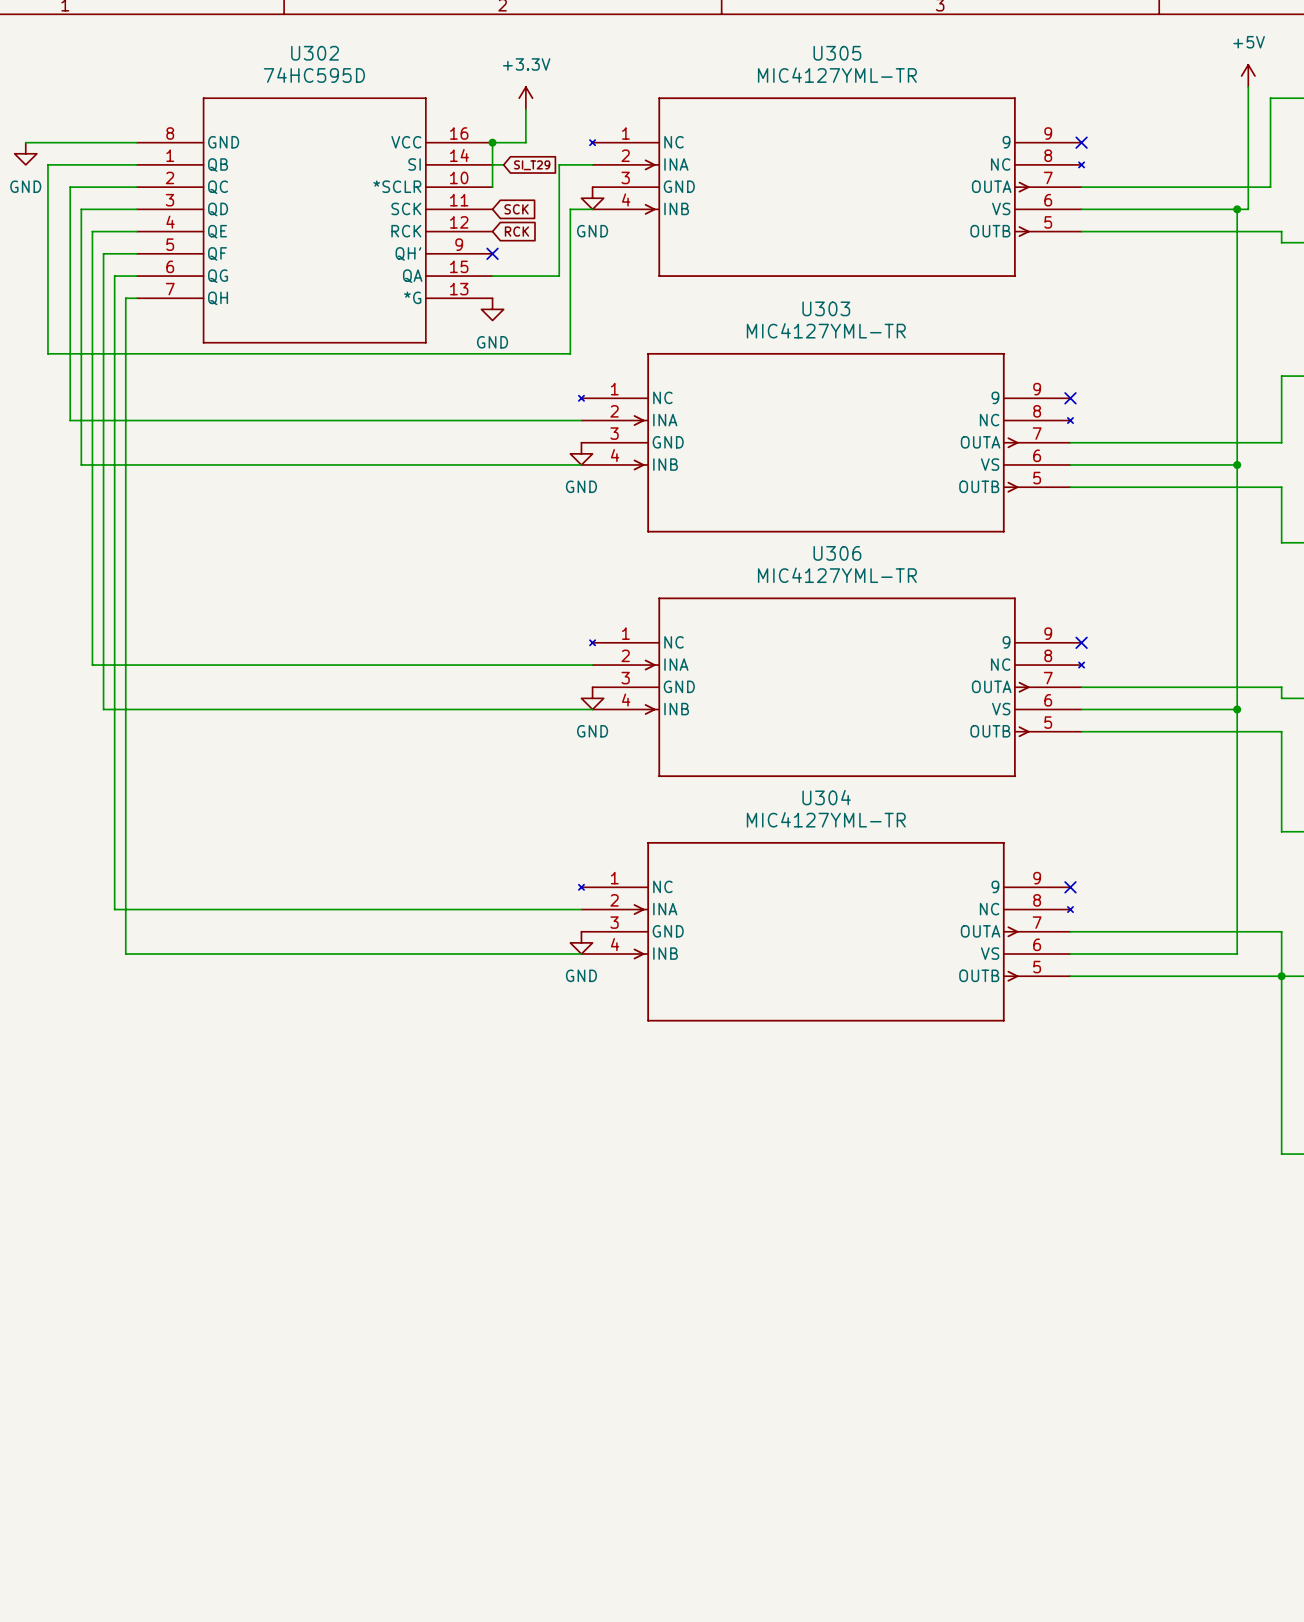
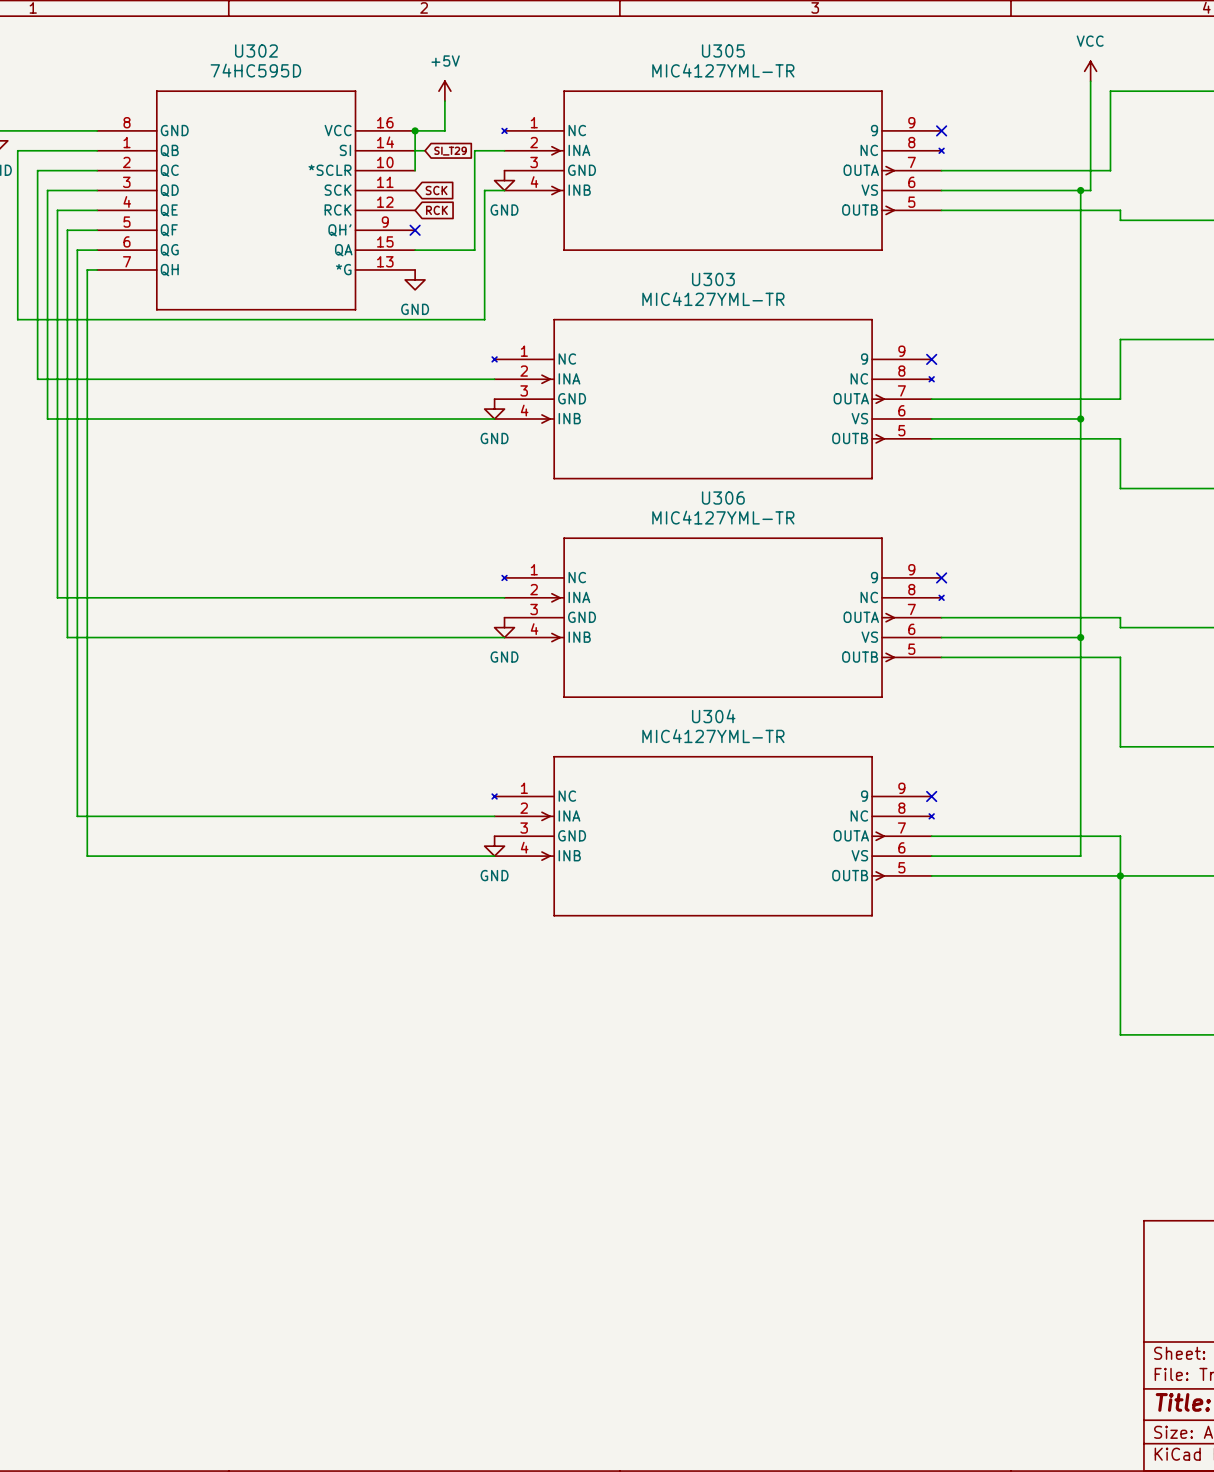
power symbol: +5V (1248, 75) -> VCC (1090, 71)
power symbol: +3.3V (525, 98) -> +5V (444, 91)

